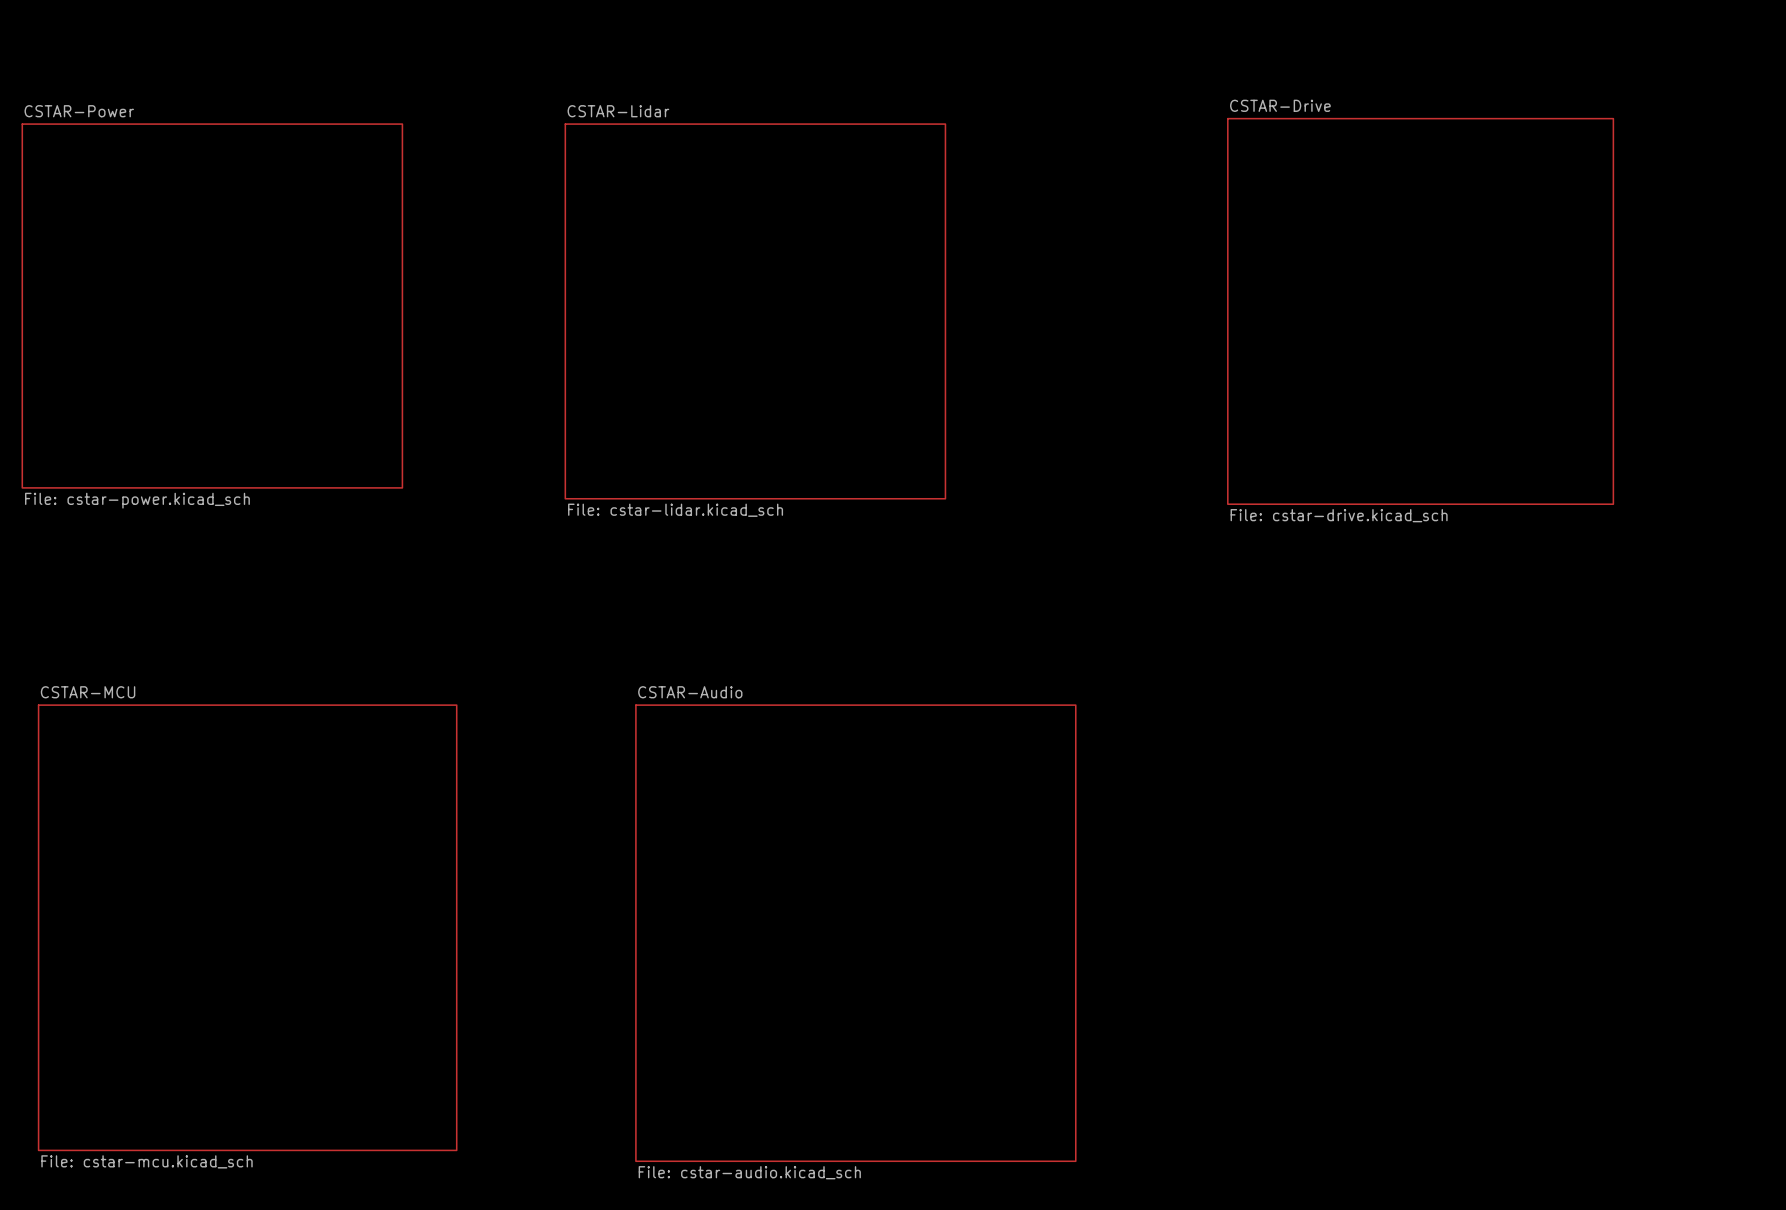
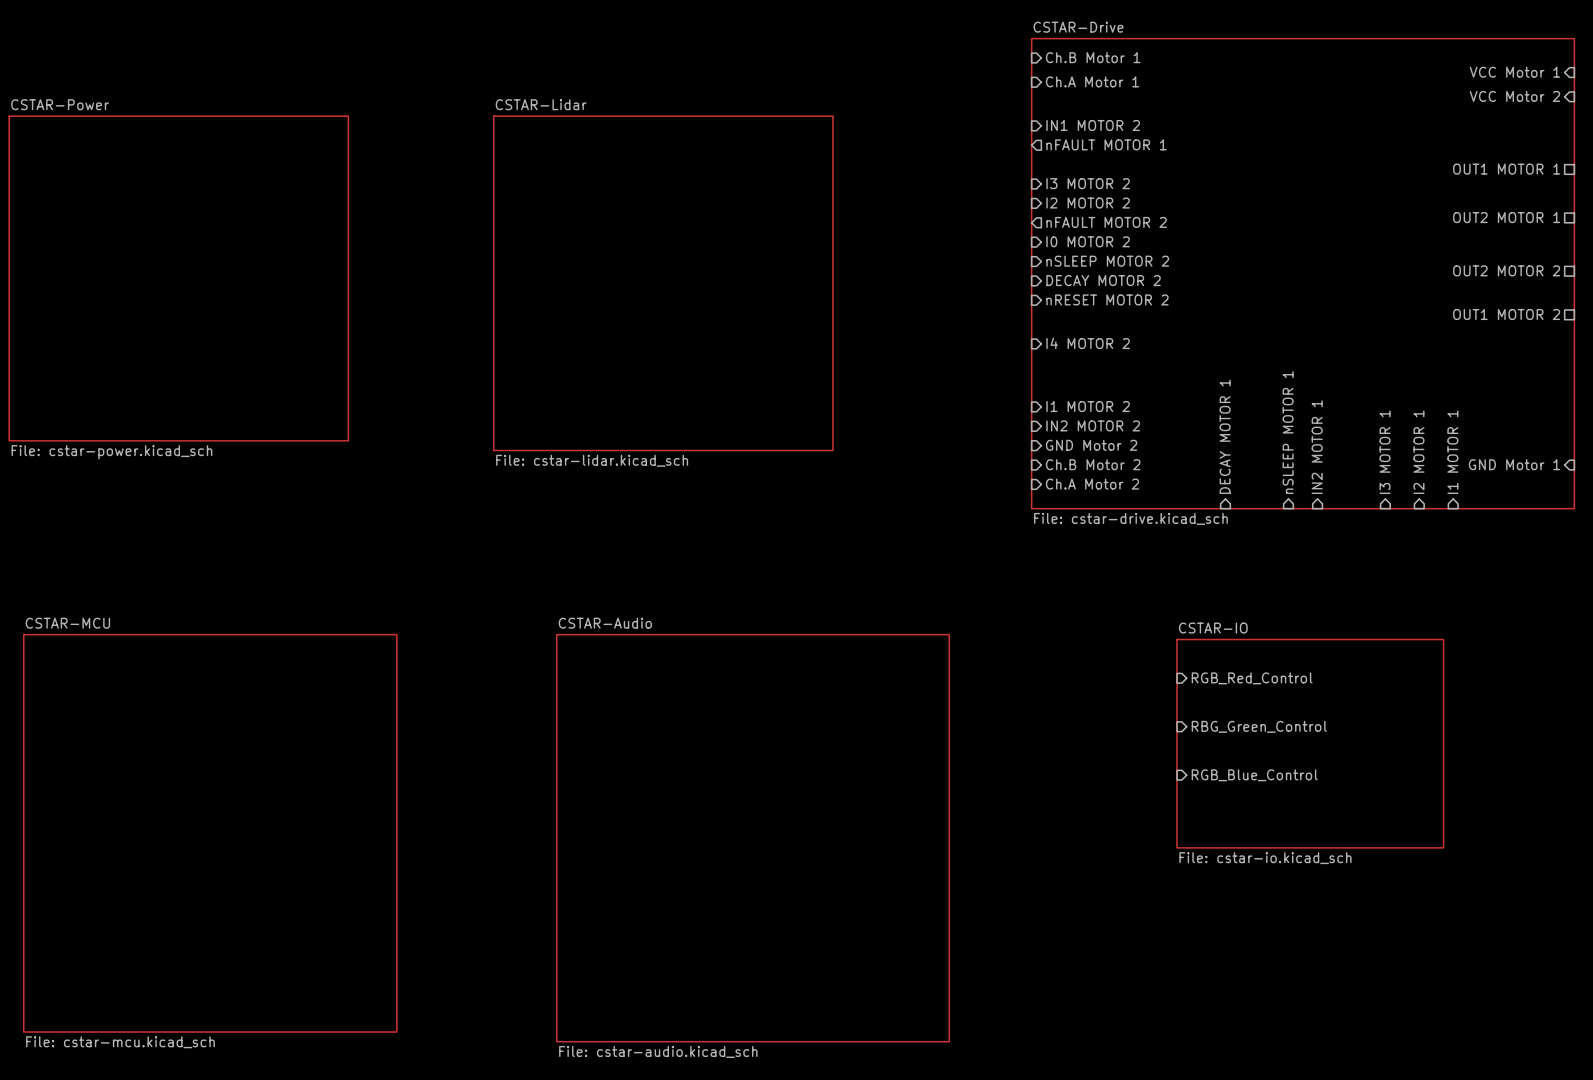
sheet pin: none -> Ch.B Motor 1 (1093, 57)
sheet pin: none -> VCC Motor 1 (1514, 72)
sheet pin: none -> Ch.A Motor 1 (1092, 81)
sheet pin: none -> VCC Motor 2 (1514, 96)
sheet pin: none -> IN1 MOTOR 2 (1093, 125)
sheet pin: none -> nFAULT MOTOR 1 (1106, 144)
sheet pin: none -> OUT1 MOTOR 1 (1506, 169)
sheet pin: none -> I3 MOTOR 2 (1088, 183)
sheet pin: none -> I2 MOTOR 2 (1088, 203)
sheet pin: none -> OUT2 MOTOR 1 (1506, 217)
sheet pin: none -> nFAULT MOTOR 2 (1106, 222)
sheet pin: none -> I0 MOTOR 2 (1088, 241)
sheet pin: none -> nSLEEP MOTOR 2 (1107, 261)
sheet pin: none -> OUT2 MOTOR 2 (1506, 270)
sheet CSTAR-Drive: none -> File: cstar-drive.kicad_sch (1303, 273)
sheet pin: none -> DECAY MOTOR 2 (1103, 280)
sheet CSTAR-Drive: File: cstar-drive.kicad_sch (1420, 311) -> none
sheet pin: none -> nRESET MOTOR 2 (1107, 299)
sheet pin: none -> OUT1 MOTOR 2 (1506, 314)
sheet pin: none -> I4 MOTOR 2 (1088, 343)
sheet pin: none -> I1 MOTOR 2 (1088, 406)
sheet pin: none -> IN2 MOTOR 2 (1093, 425)
sheet pin: none -> nSLEEP MOTOR 1 (1288, 432)
sheet pin: none -> DECAY MOTOR 1 (1225, 436)
sheet pin: none -> GND Motor 2 (1091, 445)
sheet pin: none -> IN2 MOTOR 1 (1317, 447)
sheet pin: none -> I3 MOTOR 1 (1385, 452)
sheet pin: none -> I2 MOTOR 1 (1418, 452)
sheet pin: none -> I1 MOTOR 1 (1452, 452)
sheet pin: none -> Ch.B Motor 2 (1093, 464)
sheet pin: none -> GND Motor 1 (1514, 464)
sheet pin: none -> Ch.A Motor 2 (1092, 484)
sheet pin: none -> RGB_Red_Control (1252, 678)
sheet pin: none -> RBG_Green_Control (1259, 726)
sheet CSTAR-IO: none -> File: cstar-io.kicad_sch (1310, 743)
sheet pin: none -> RGB_Blue_Control (1254, 775)

